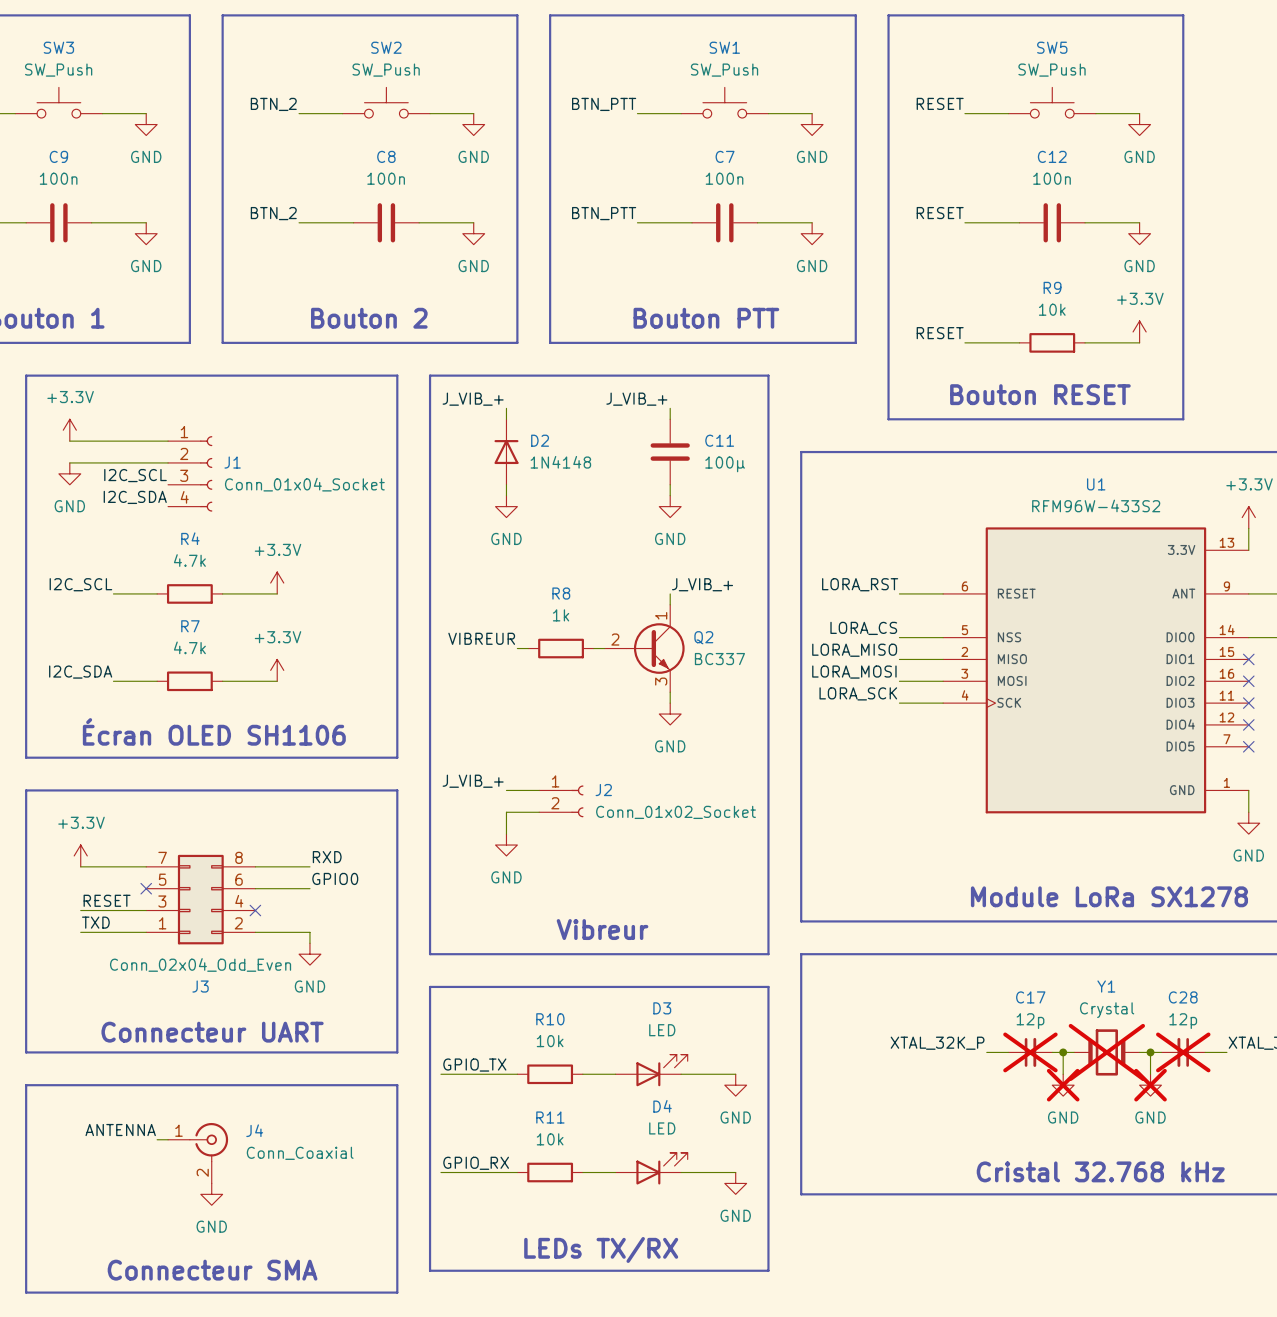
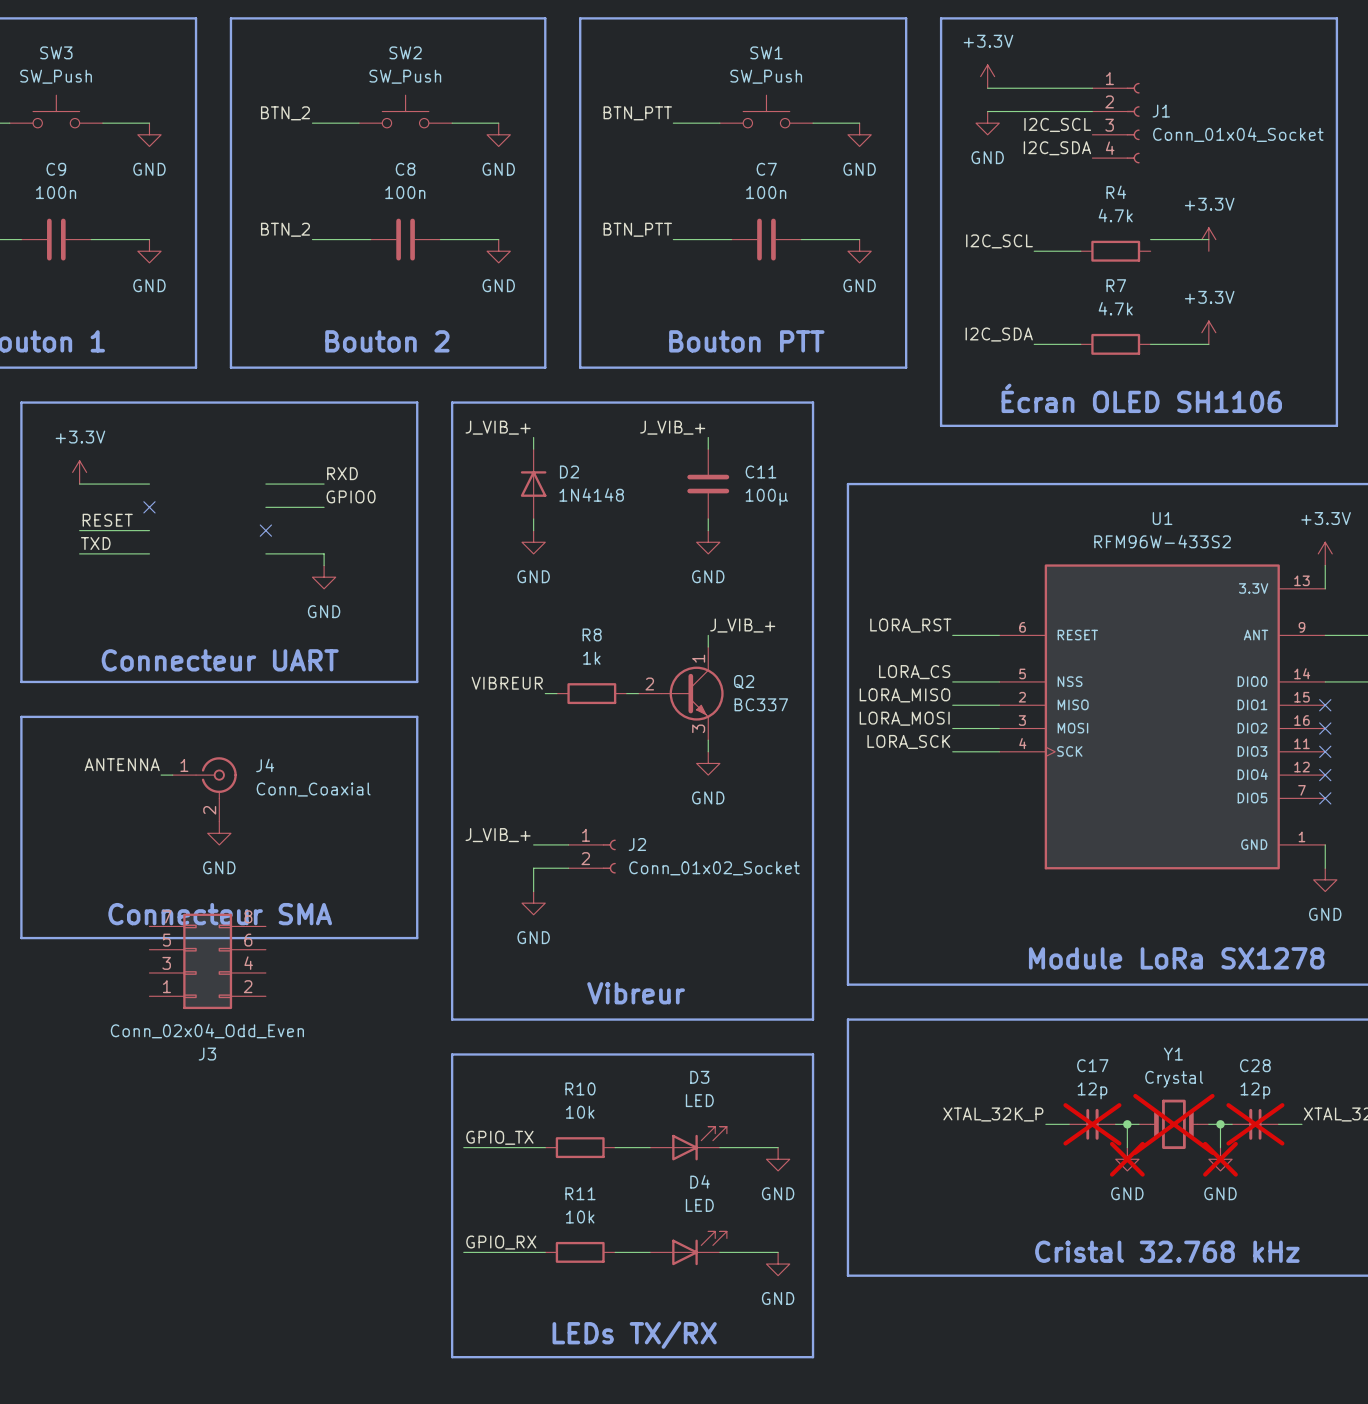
line: (1183, 15) (1183, 419) (888, 419) (888, 397) -> (1255, 18) (1336, 18) (1336, 425) (941, 425)
power symbol: none -> +3.3V (987, 76)
wire: none -> (987, 88) (1092, 88)
wire: none -> (987, 111) (1092, 111)
SW5: SW_Push (1052, 102) -> none
label: RESET (940, 103) -> none
power symbol: none -> GND (987, 123)
wire: (964, 113) (1008, 113) -> (1034, 251) (1080, 251)
wire: (1095, 113) (1139, 113) -> none
label: none -> I2C_SCL (1057, 124)
power symbol: GND (1139, 124) -> none
label: none -> I2C_SDA (1057, 148)
label: RESET (940, 213) -> none
wire: (964, 222) (1019, 222) -> none
C12: 100n (1052, 222) -> none
power symbol: none -> +3.3V (1208, 239)
label: none -> I2C_SCL (999, 241)
power symbol: GND (1139, 233) -> none
label: none -> I2C_SDA (999, 334)
wire: none -> (1034, 344) (1080, 344)
power symbol position: +3.3V (1139, 331) -> +3.3V (1208, 332)
label: RESET (940, 333) -> none
wire: (964, 342) (1019, 342) -> none
R9: 10k (1052, 342) -> none
wire: (1085, 342) (1139, 342) -> (1150, 344) (1208, 344)
text: none -> Écran OLED SH1106 (1141, 398)
text: Bouton RESET (1040, 394) -> none
power symbol position: +3.3V (69, 430) -> +3.3V (79, 472)
wire: (69, 441) (168, 441) -> none
label: none -> RXD (342, 473)
wire: none -> (79, 484) (149, 484)
wire: none -> (265, 484) (324, 484)
wire: (69, 462) (168, 462) -> none
label: none -> GPIO0 (351, 496)
power symbol: GND (69, 473) -> none
no-connect mark: none -> (149, 507)
J1 position: (190, 473) -> (1116, 123)
label: I2C_SCL (135, 475) -> none
label: none -> RESET (107, 520)
wire: none -> (79, 530) (149, 530)
no-connect mark: none -> (265, 530)
label: I2C_SDA (135, 497) -> none
label: none -> TXD (95, 543)
wire: none -> (79, 553) (149, 553)
wire: none -> (265, 553) (324, 553) (324, 565)
power symbol: none -> GND (324, 577)
power symbol: +3.3V (277, 583) -> none
label: I2C_SCL (80, 584) -> none
wire: (113, 593) (157, 593) -> none
R4 position: (189, 593) -> (1115, 251)
wire: (222, 593) (277, 593) -> (265, 507) (324, 507)
text: none -> Connecteur UART (220, 660)
line: (26, 637) (26, 670) -> (21, 681) (417, 681)
line: (397, 637) (397, 670) -> (21, 716) (417, 716)
power symbol: +3.3V (277, 670) -> none
label: I2C_SDA (80, 672) -> none
wire: (113, 681) (157, 681) -> none
R7 position: (189, 681) -> (1115, 344)
wire: (222, 681) (277, 681) -> none
label: none -> ANTENNA (122, 764)
wire: none -> (161, 775) (172, 775)
text: Écran OLED SH1106 (214, 731) -> none
line: (26, 757) (397, 757) -> (21, 810) (21, 844)
power symbol: none -> GND (219, 833)
line: (26, 790) (397, 790) -> (417, 810) (417, 844)
power symbol: +3.3V (80, 855) -> none
text: none -> Connecteur SMA (220, 914)
label: RXD (327, 857) -> none
wire: (80, 866) (146, 866) -> none
wire: (255, 866) (309, 866) -> none
line: (26, 877) (26, 1052) (397, 1052) (397, 877) -> (21, 938) (417, 938)
label: GPIO0 (335, 878) -> none
no-connect mark: (146, 888) -> none
wire: (255, 888) (309, 888) -> none
label: RESET (107, 900) -> none
wire: (80, 910) (146, 910) -> none
no-connect mark: (255, 910) -> none
label: TXD (95, 922) -> none
wire: (80, 932) (146, 932) -> none
wire: (255, 932) (309, 932) (309, 943) -> none
power symbol: GND (309, 954) -> none
text: Connecteur UART (212, 1032) -> none
line: (26, 1085) (26, 1292) (397, 1292) (397, 1085) (26, 1085) -> none
label: ANTENNA (120, 1130) -> none
wire: (157, 1139) (168, 1139) -> none
J4 position: (198, 1153) -> (204, 789)
power symbol: GND (211, 1194) -> none
text: Connecteur SMA (212, 1270) -> none

